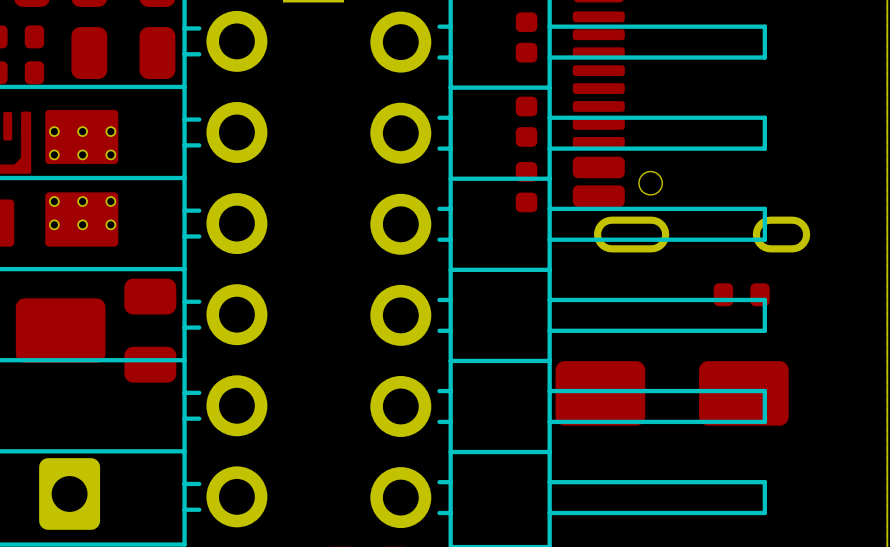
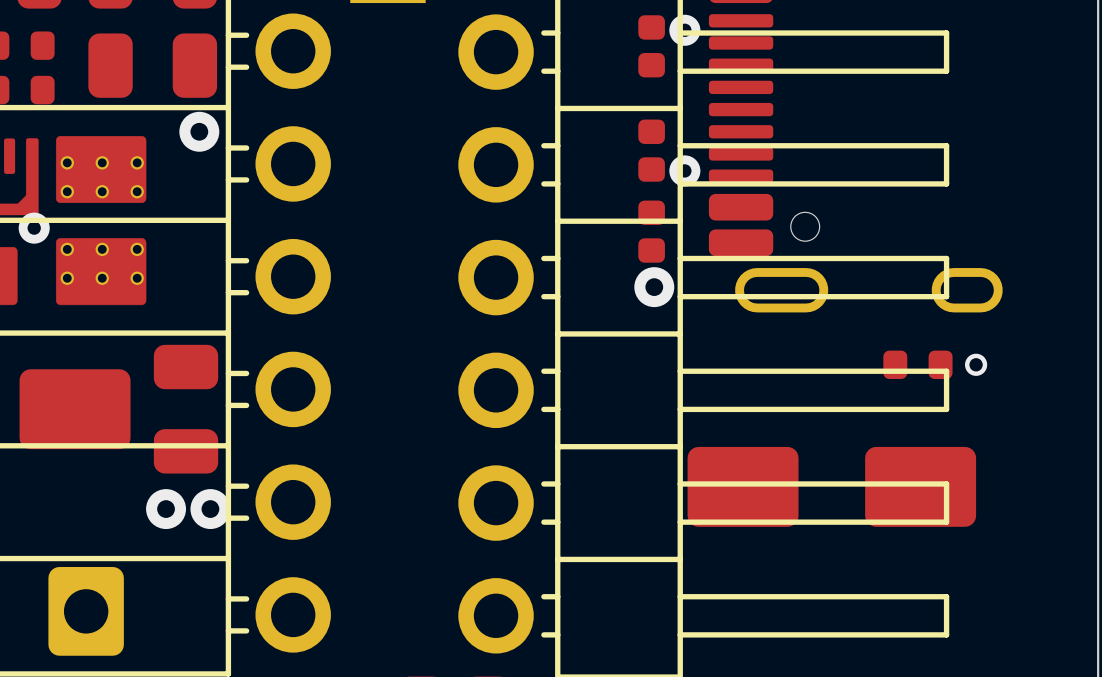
via: none -> (684, 30)
via: none -> (199, 131)
via: none -> (684, 170)
via: none -> (34, 228)
via: none -> (654, 287)
via: none -> (976, 364)
via: none -> (166, 509)
via: none -> (210, 509)

